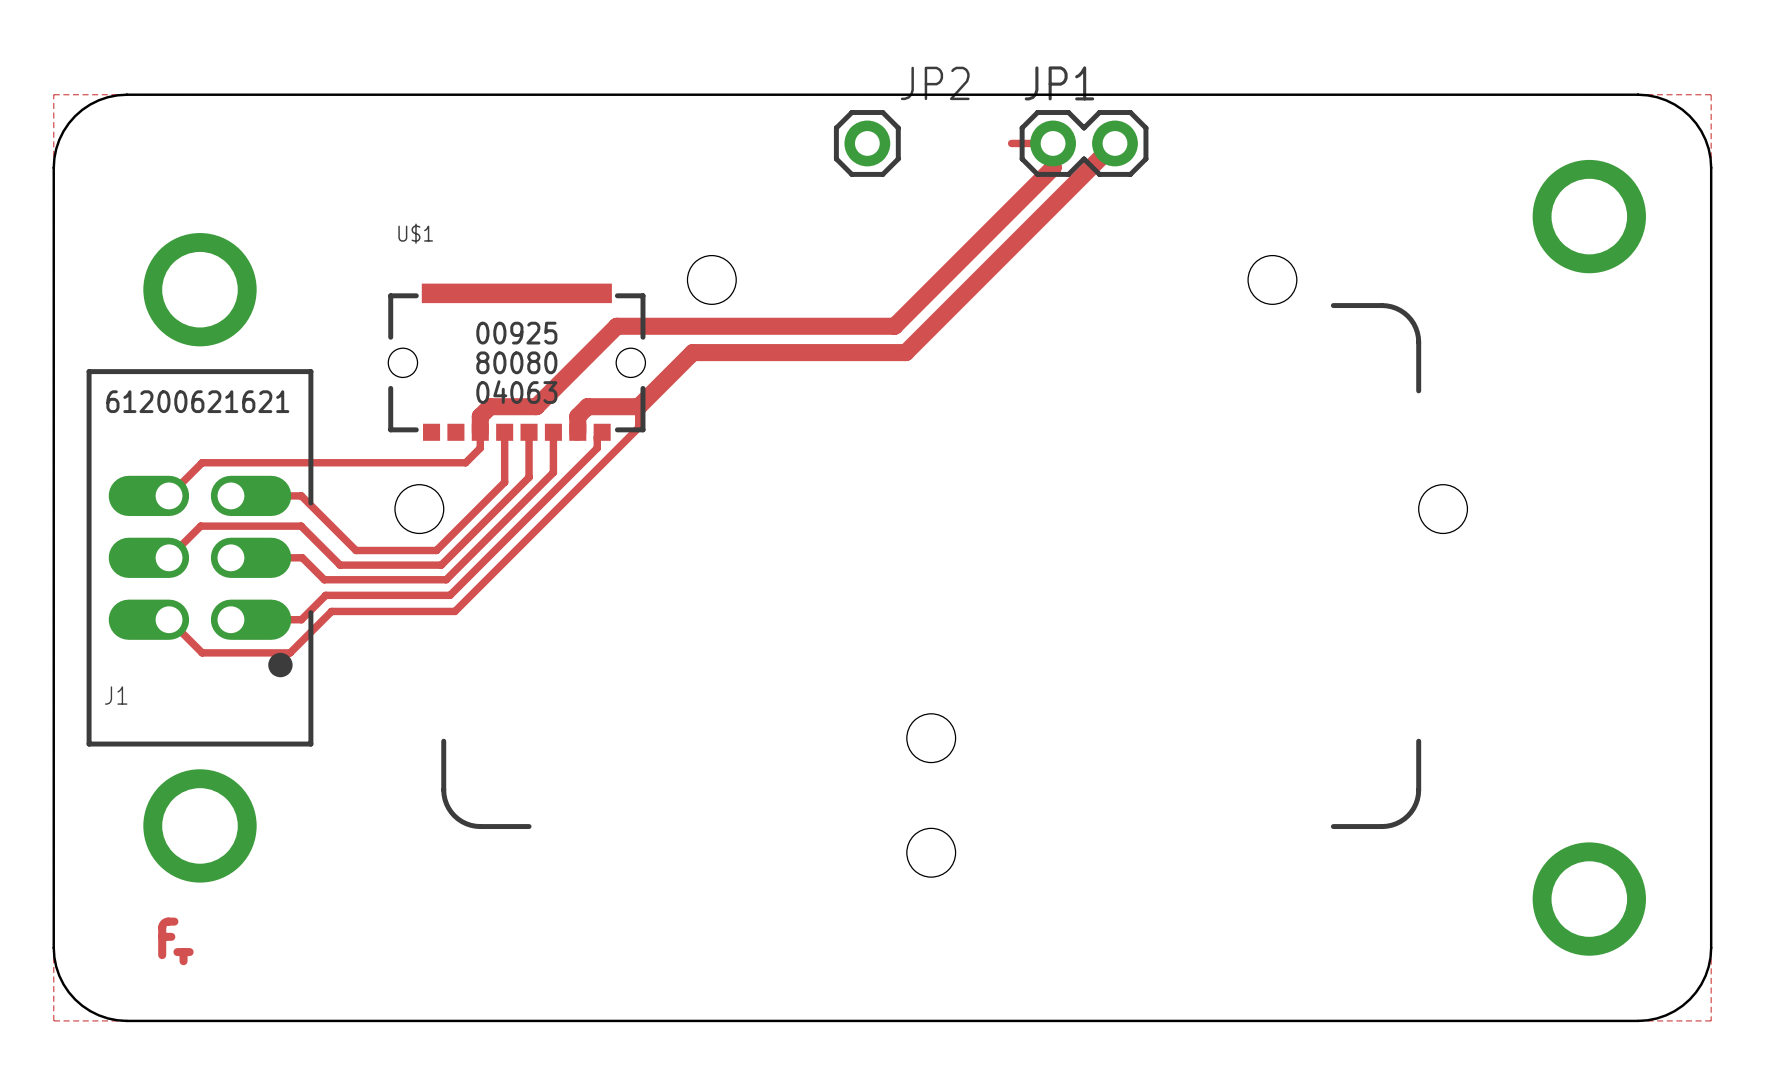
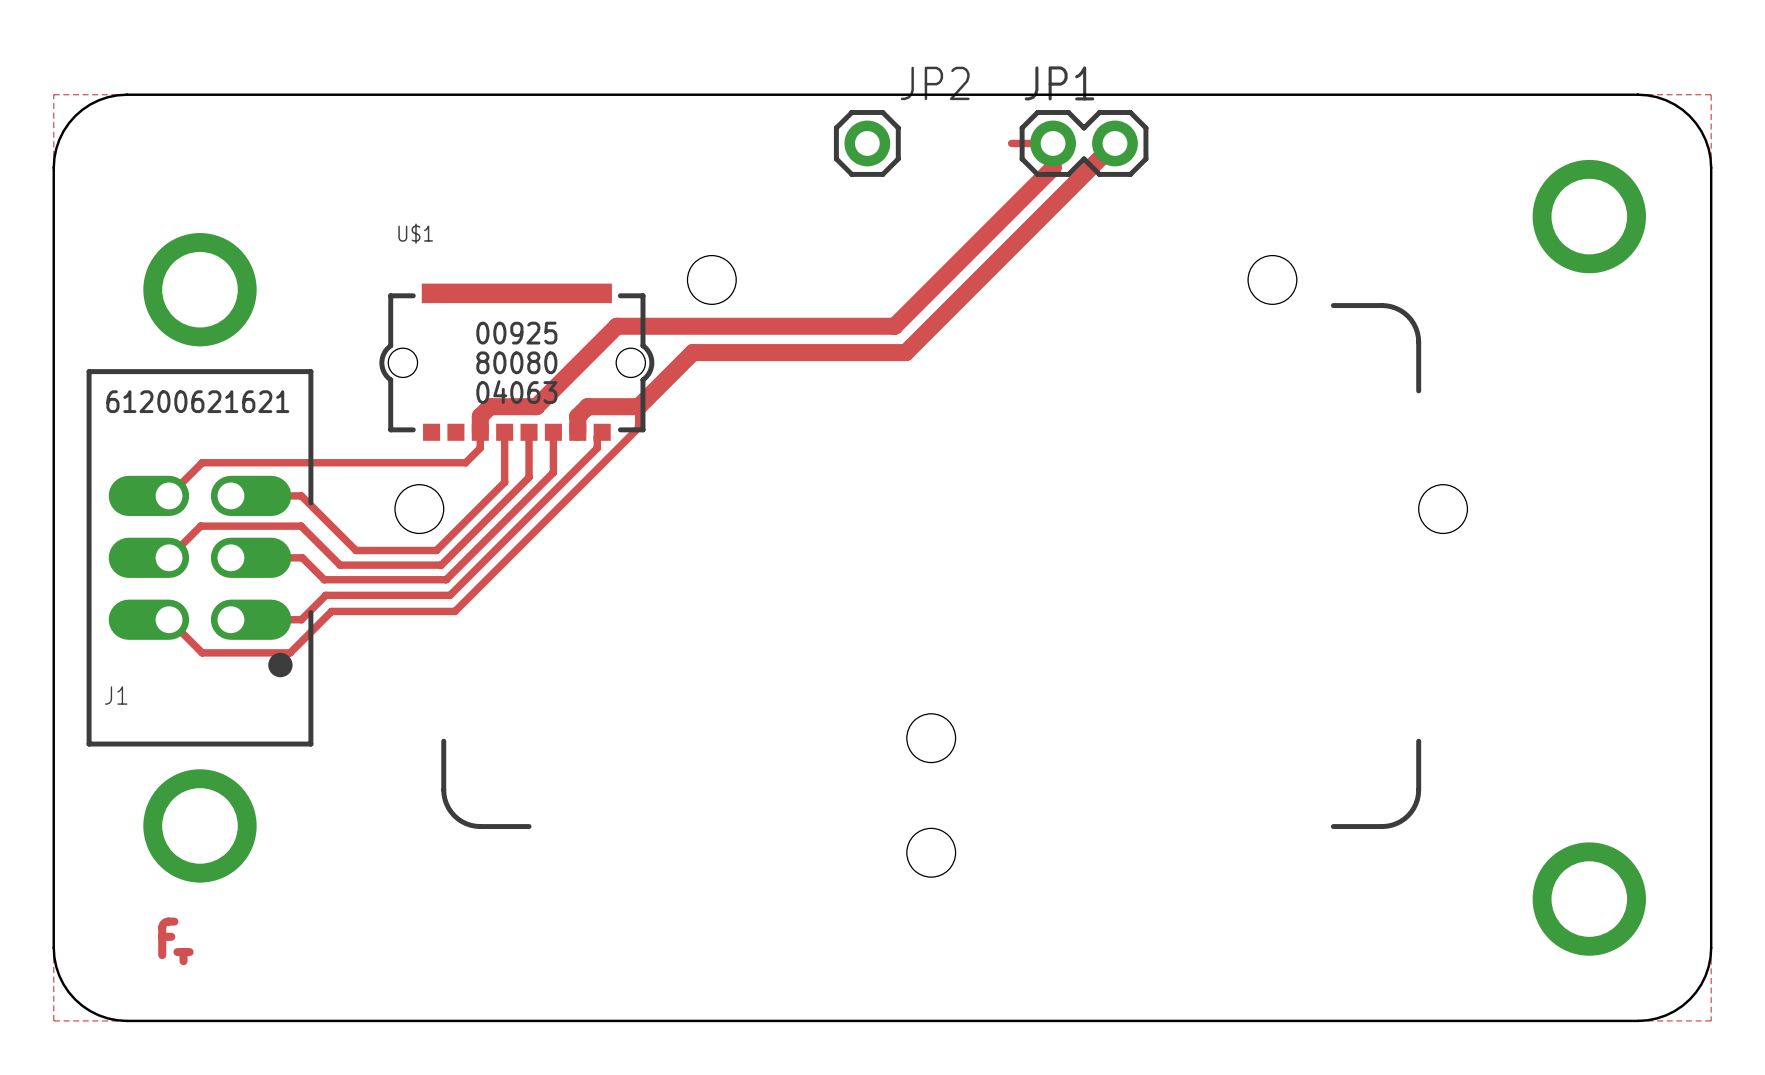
U$1 footprint: [388, 293, 646, 441] -> [379, 283, 655, 441]

